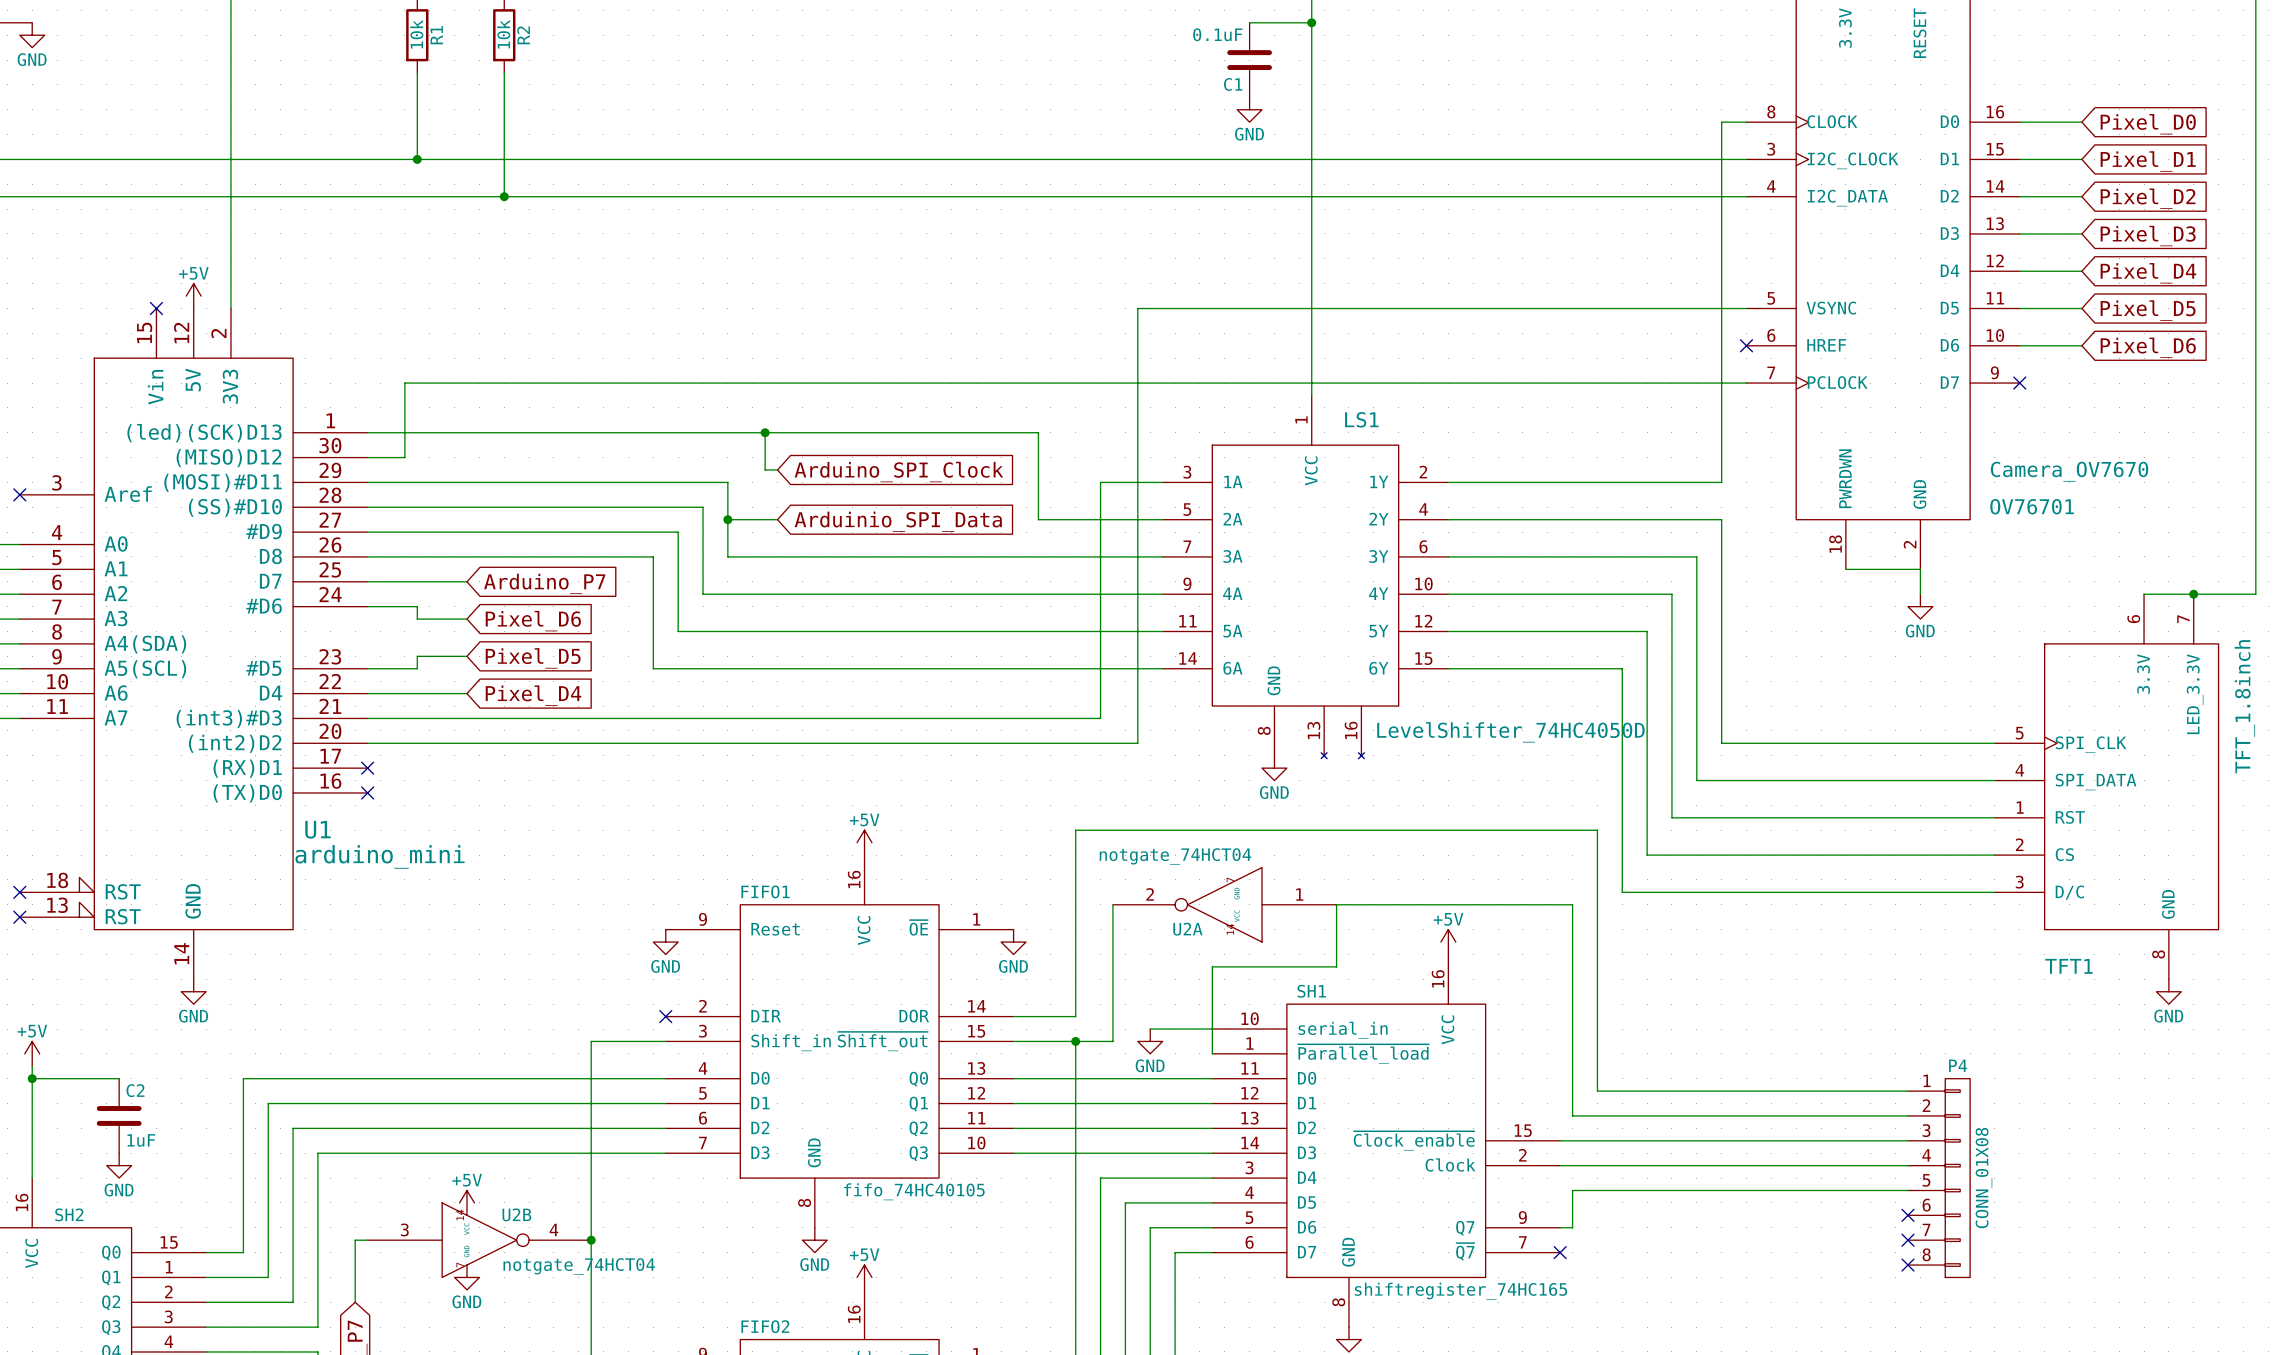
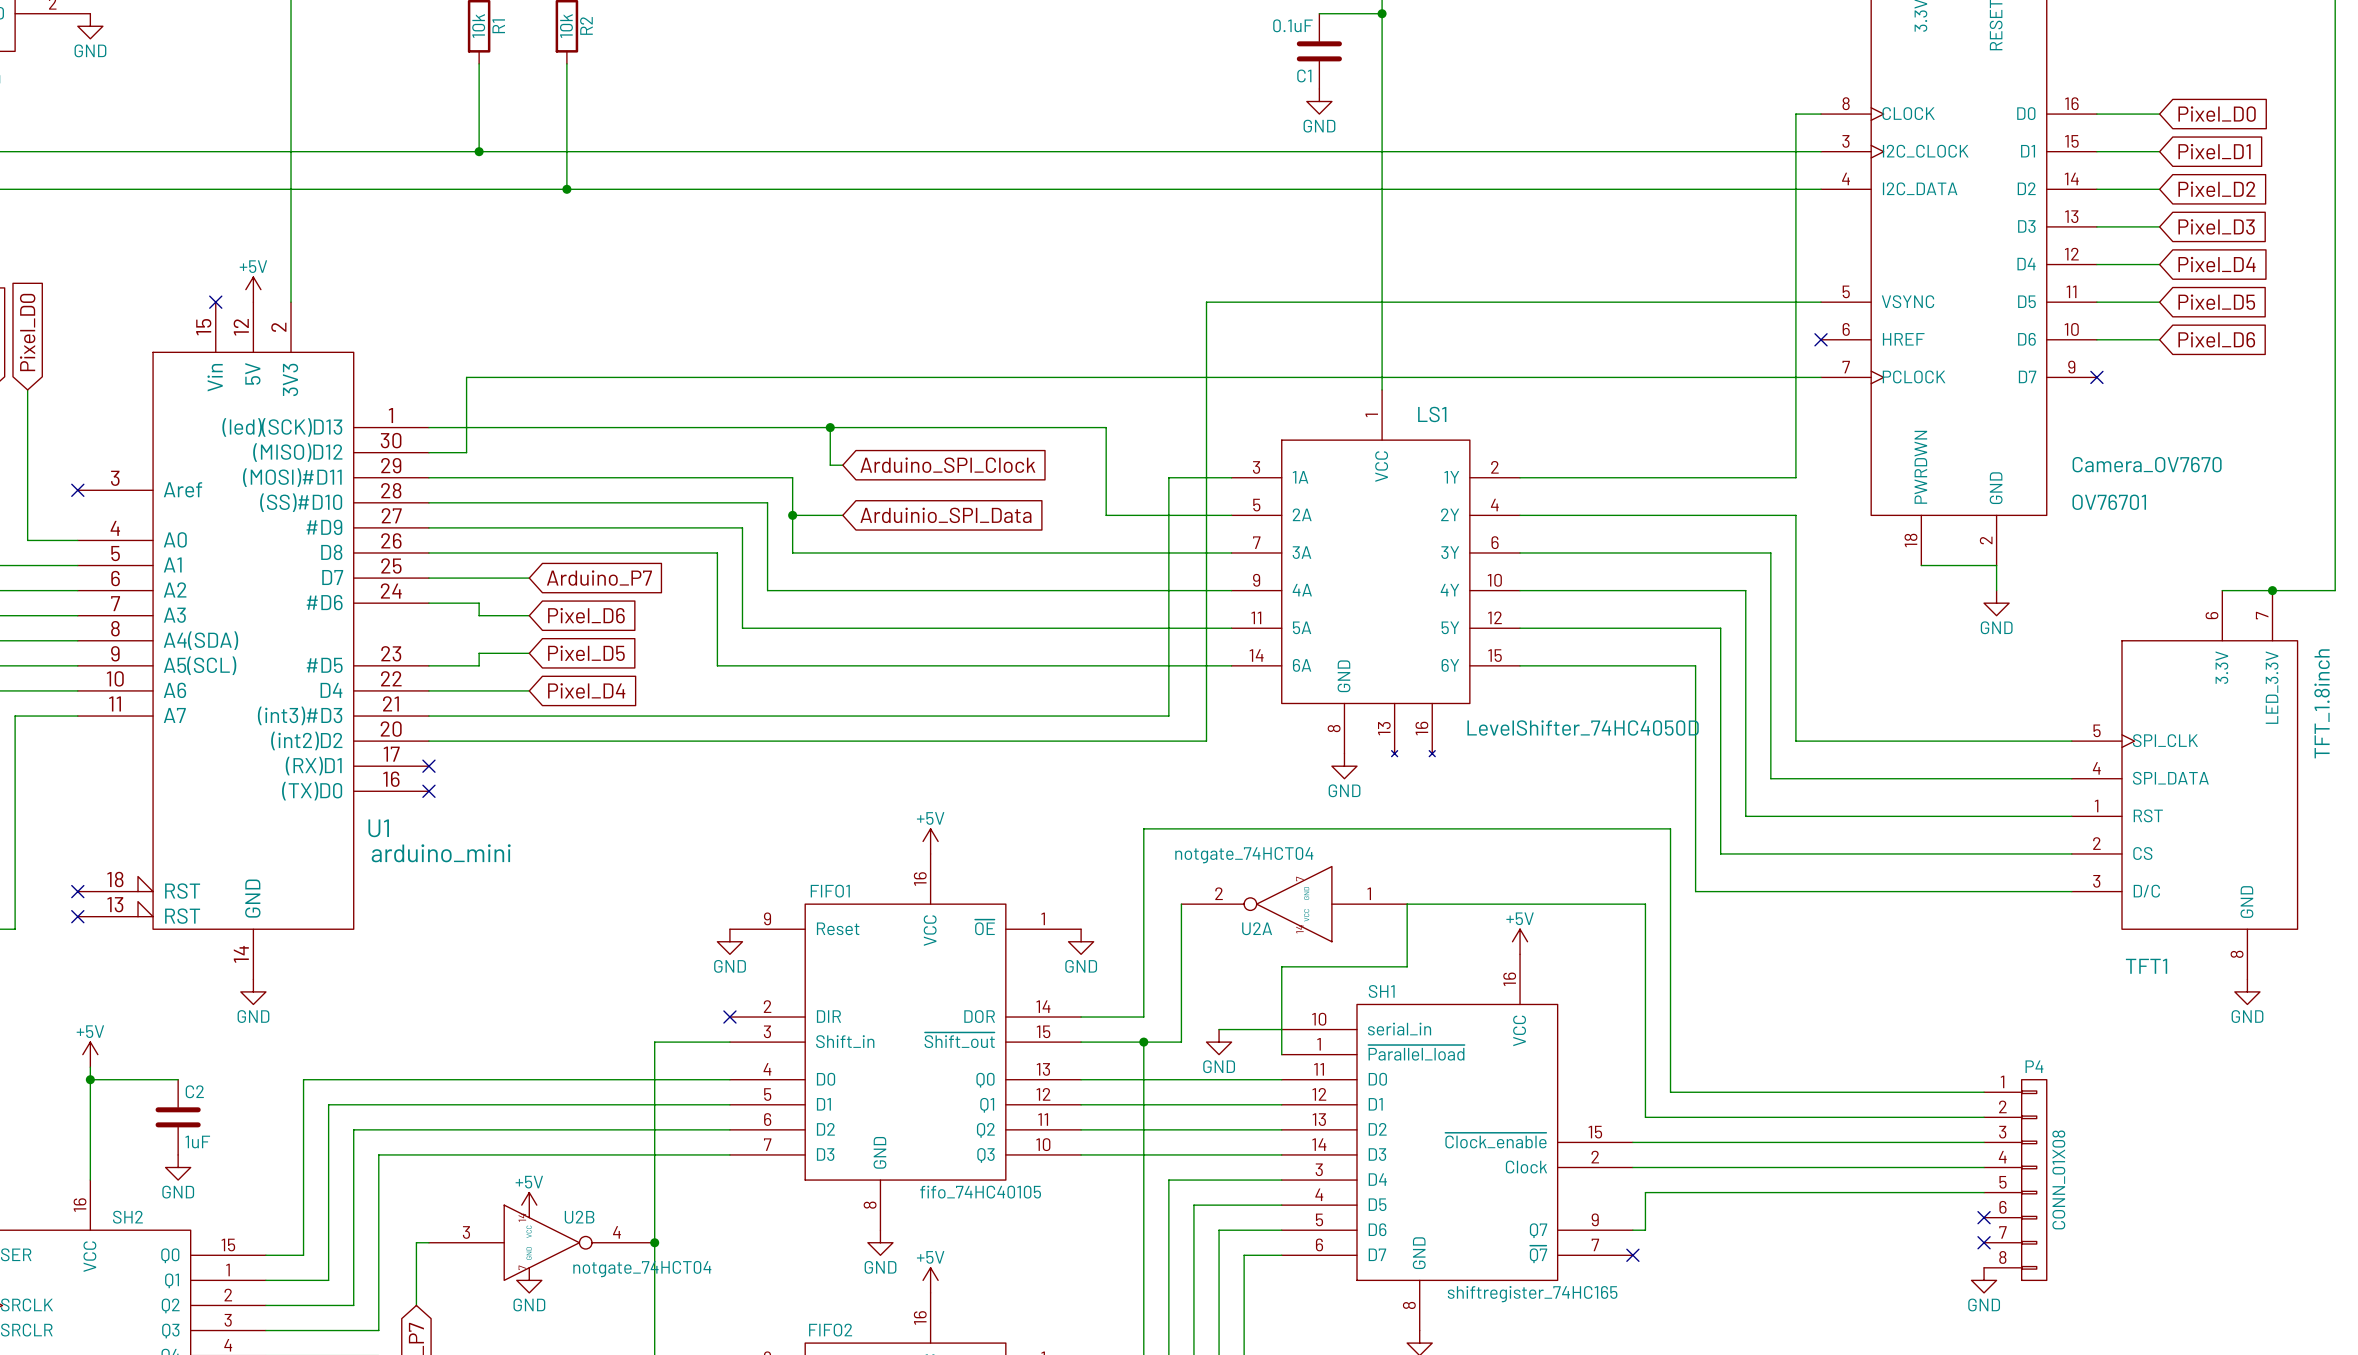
no-connect mark: (1907, 1265) -> none
power symbol: none -> GND (1984, 1280)

